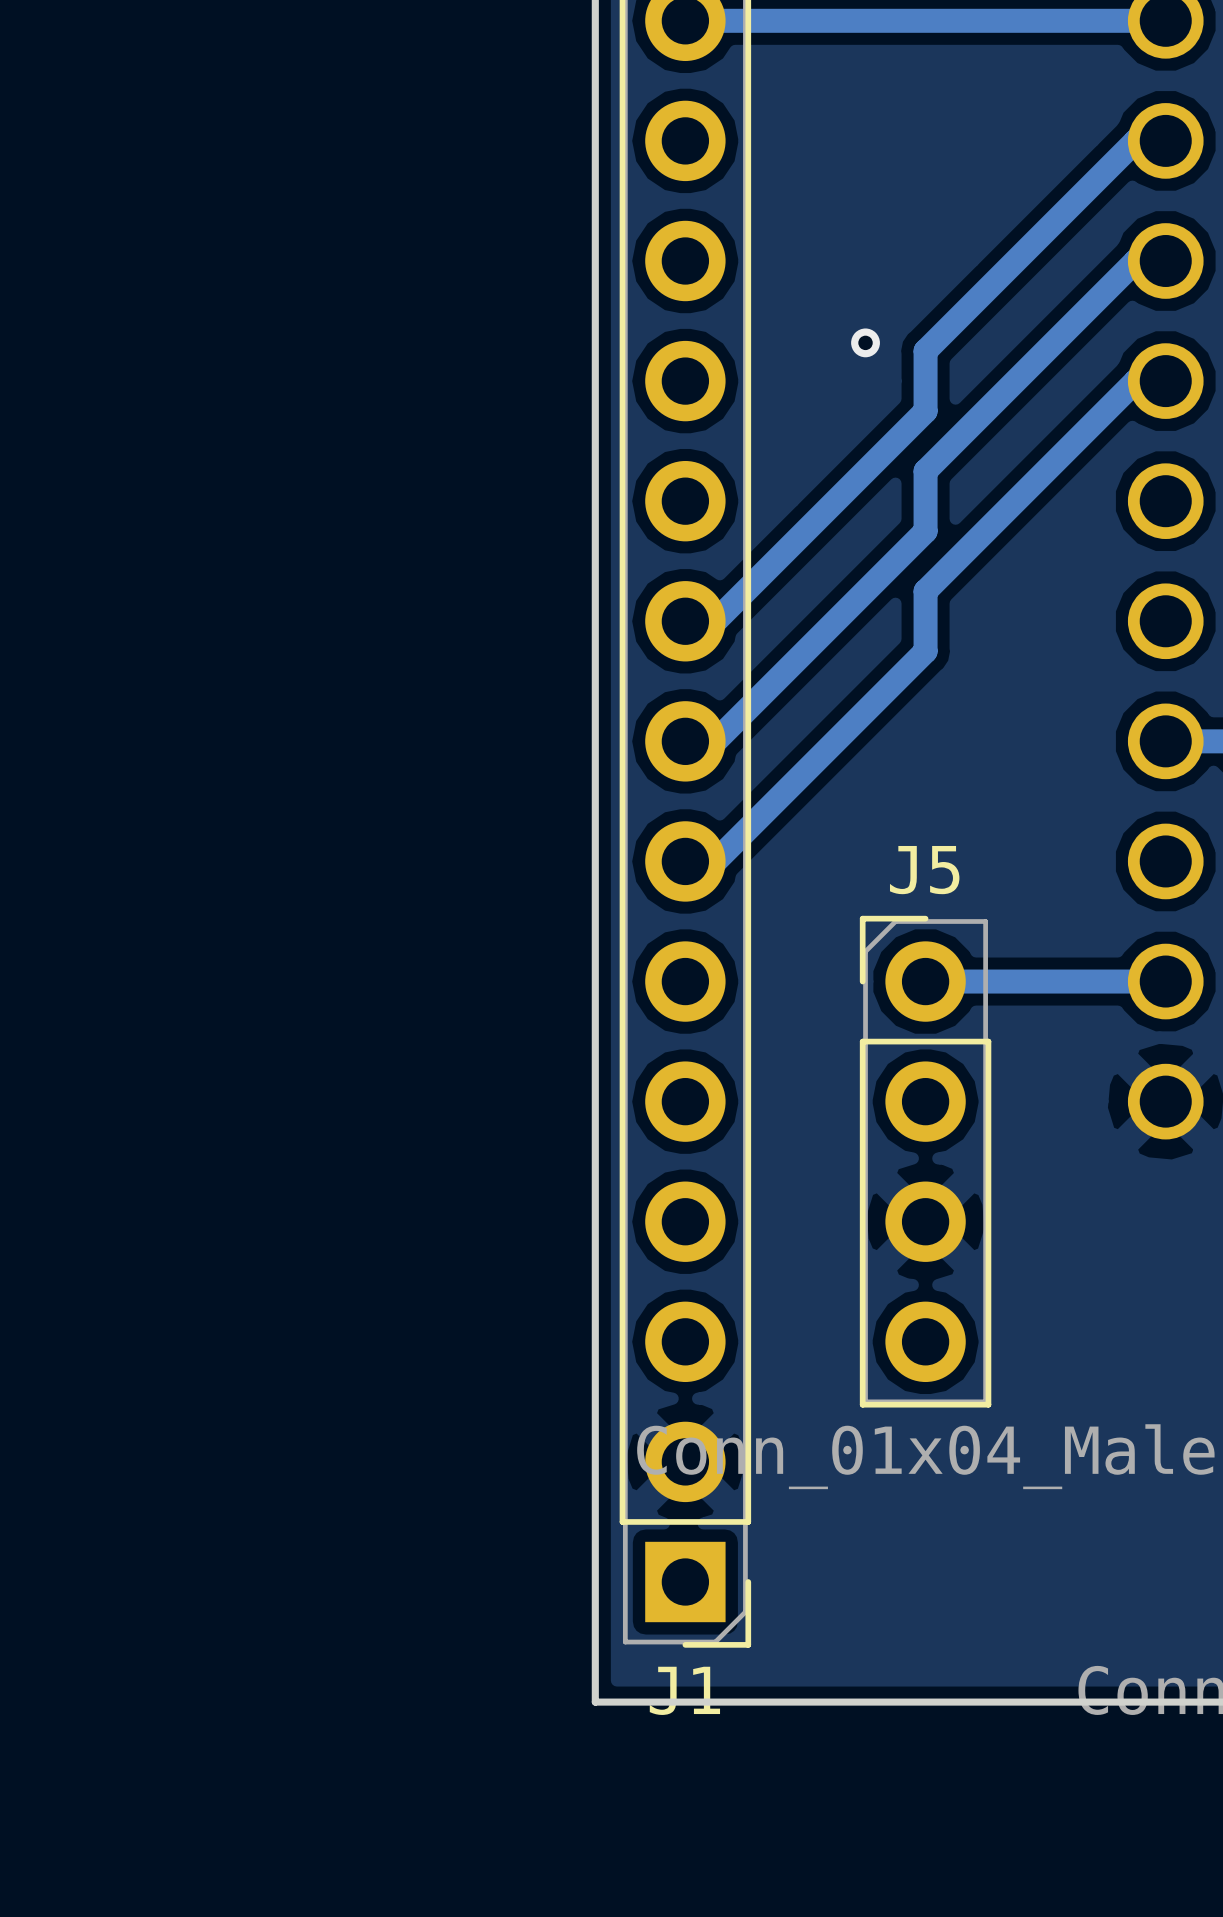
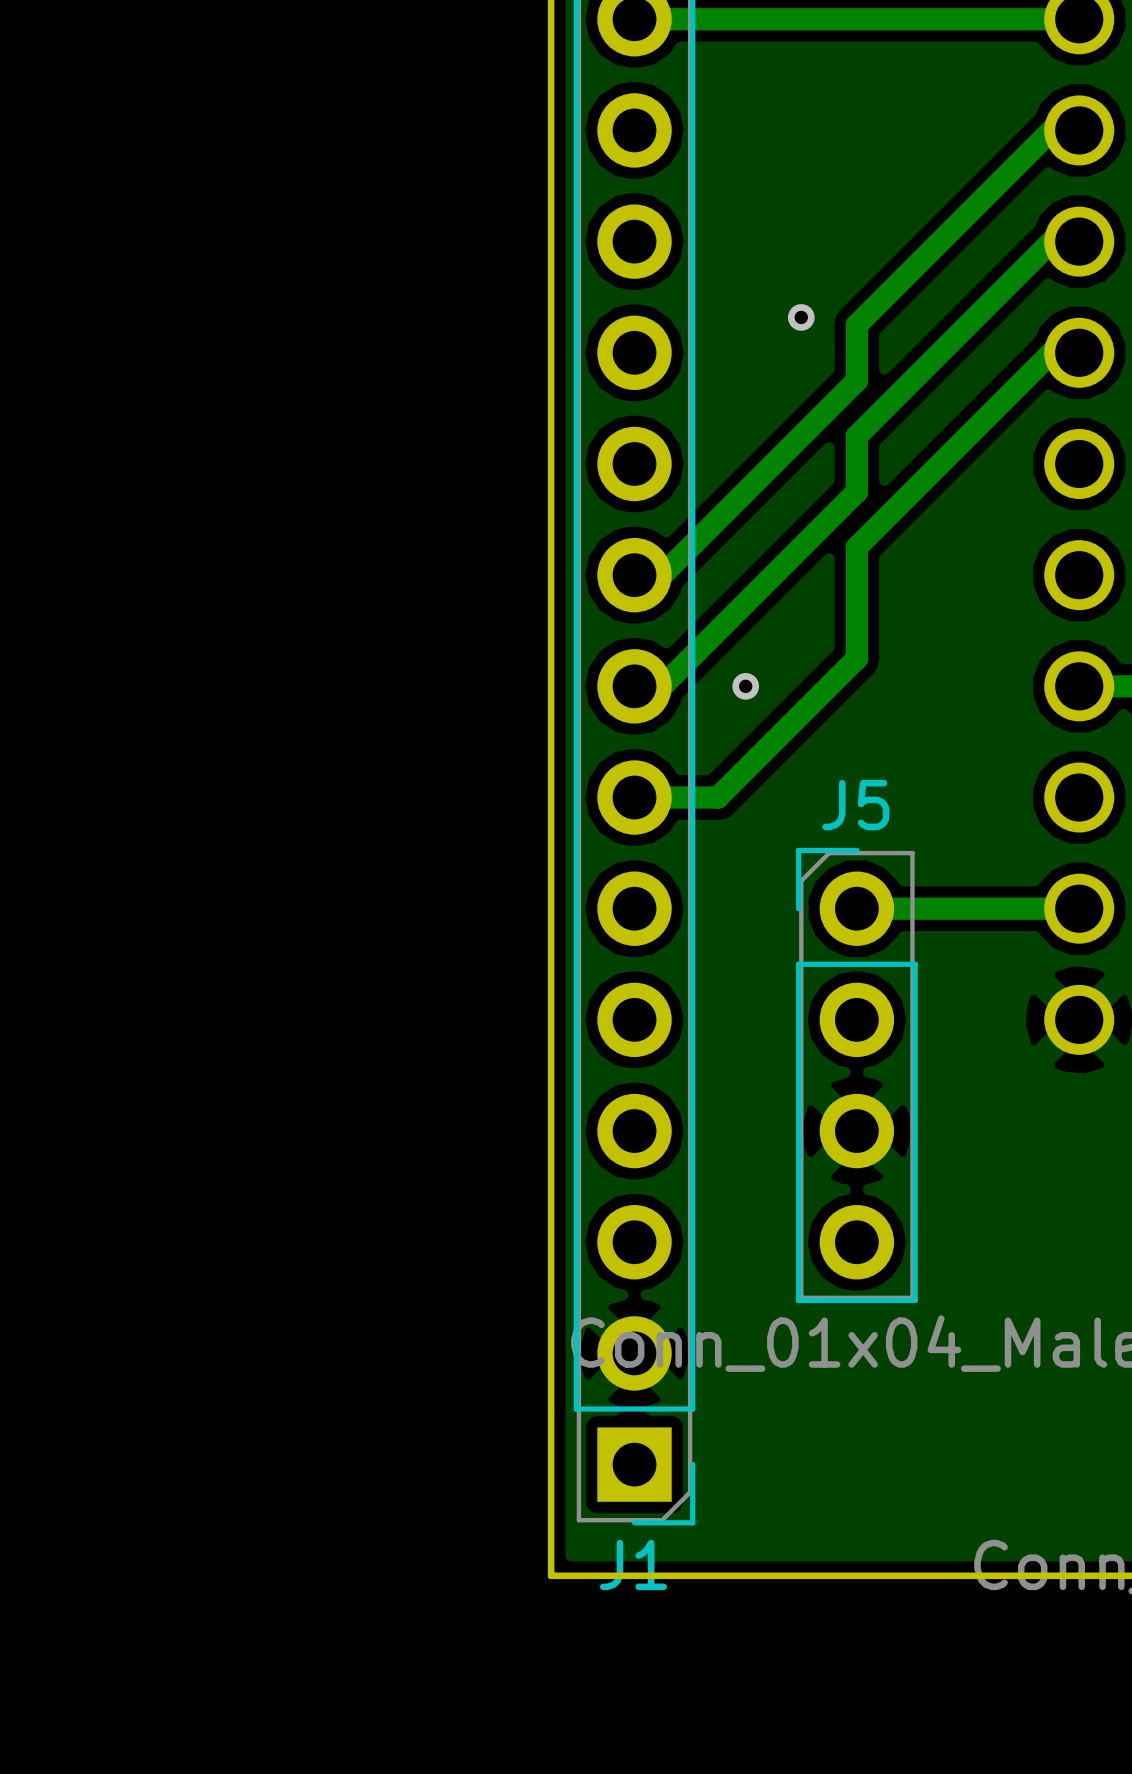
track: (925, 651) (715, 861) -> (856, 602) (856, 658) (717, 797) (662, 797)
via: none -> (745, 686)

